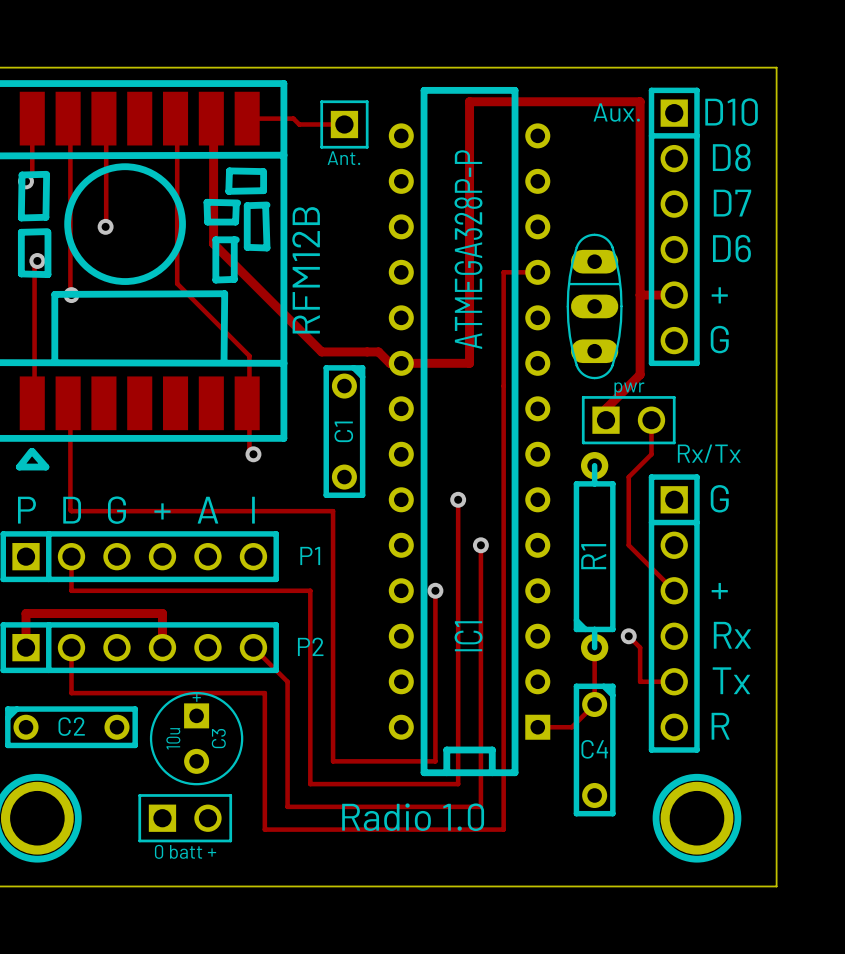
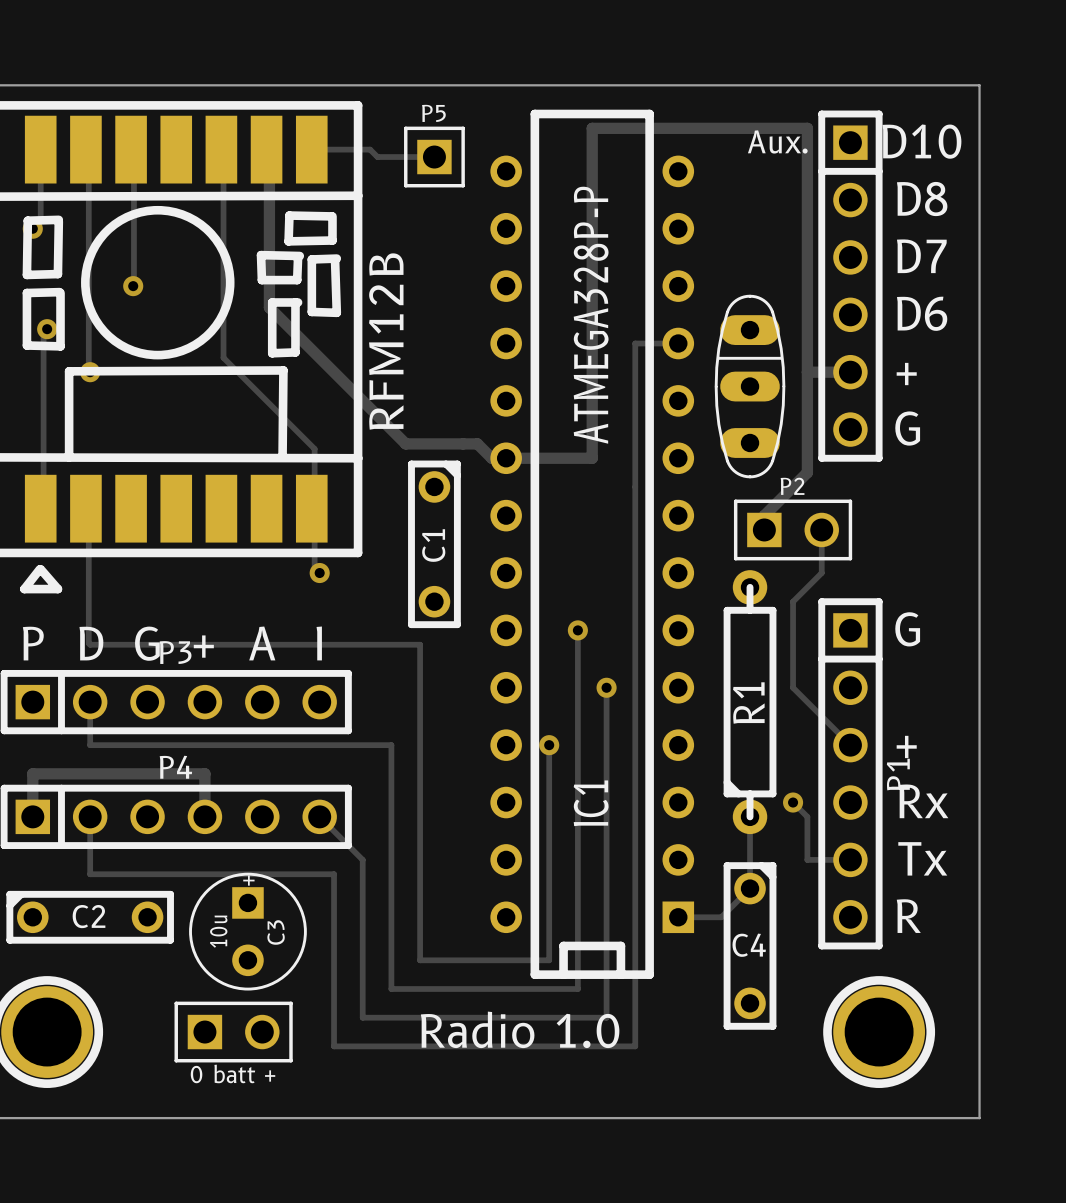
Ant. name: Ant. (343, 158) -> P5 (433, 113)
pwr name: pwr (629, 389) -> P2 (792, 486)
Rx/Tx name: Rx/Tx (709, 453) -> P1 (898, 774)
P1 name: P1 (310, 555) -> P3 (175, 652)
P2 name: P2 (310, 646) -> P4 (175, 767)

